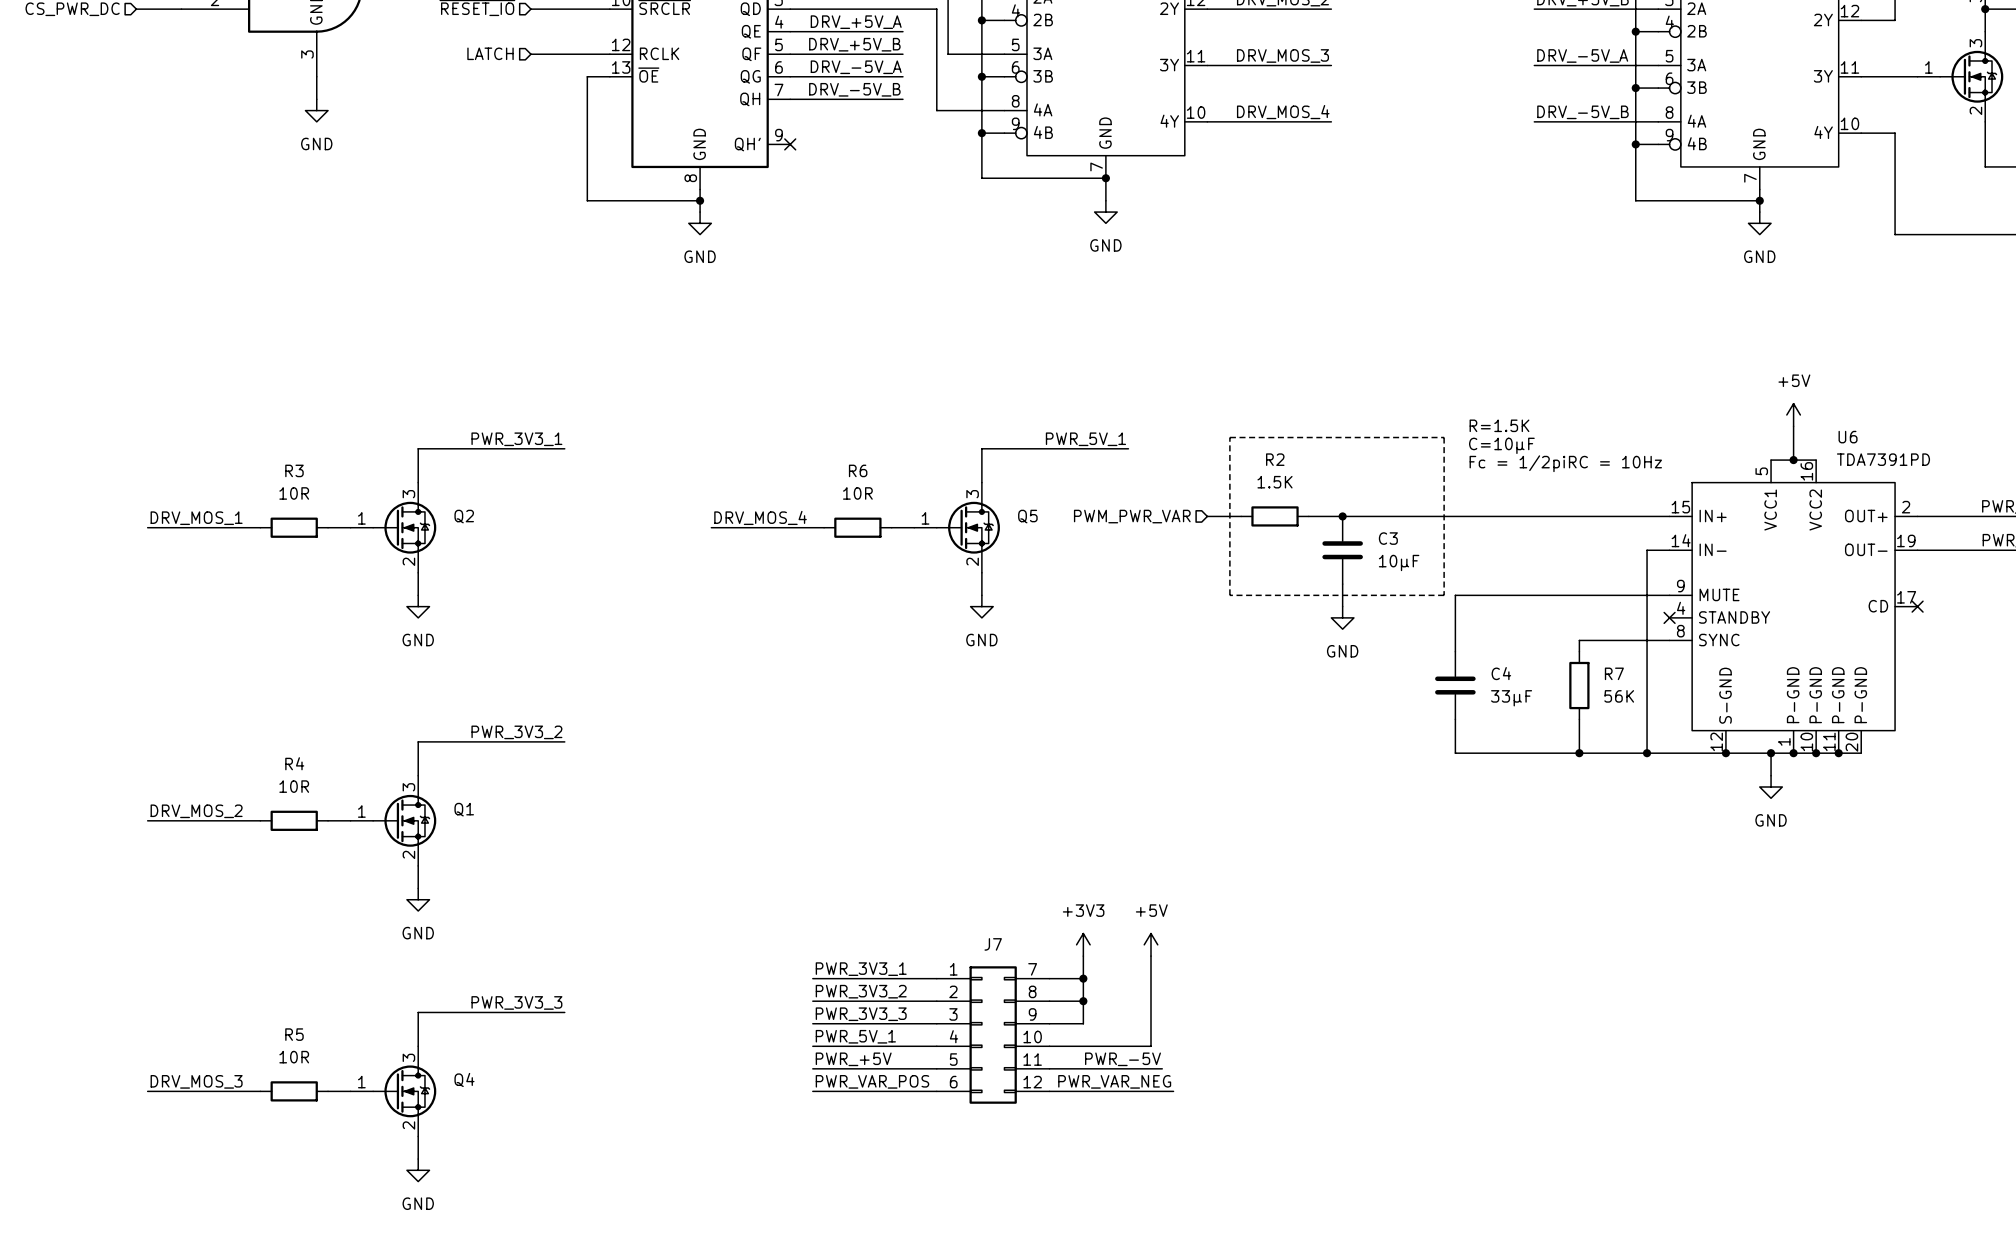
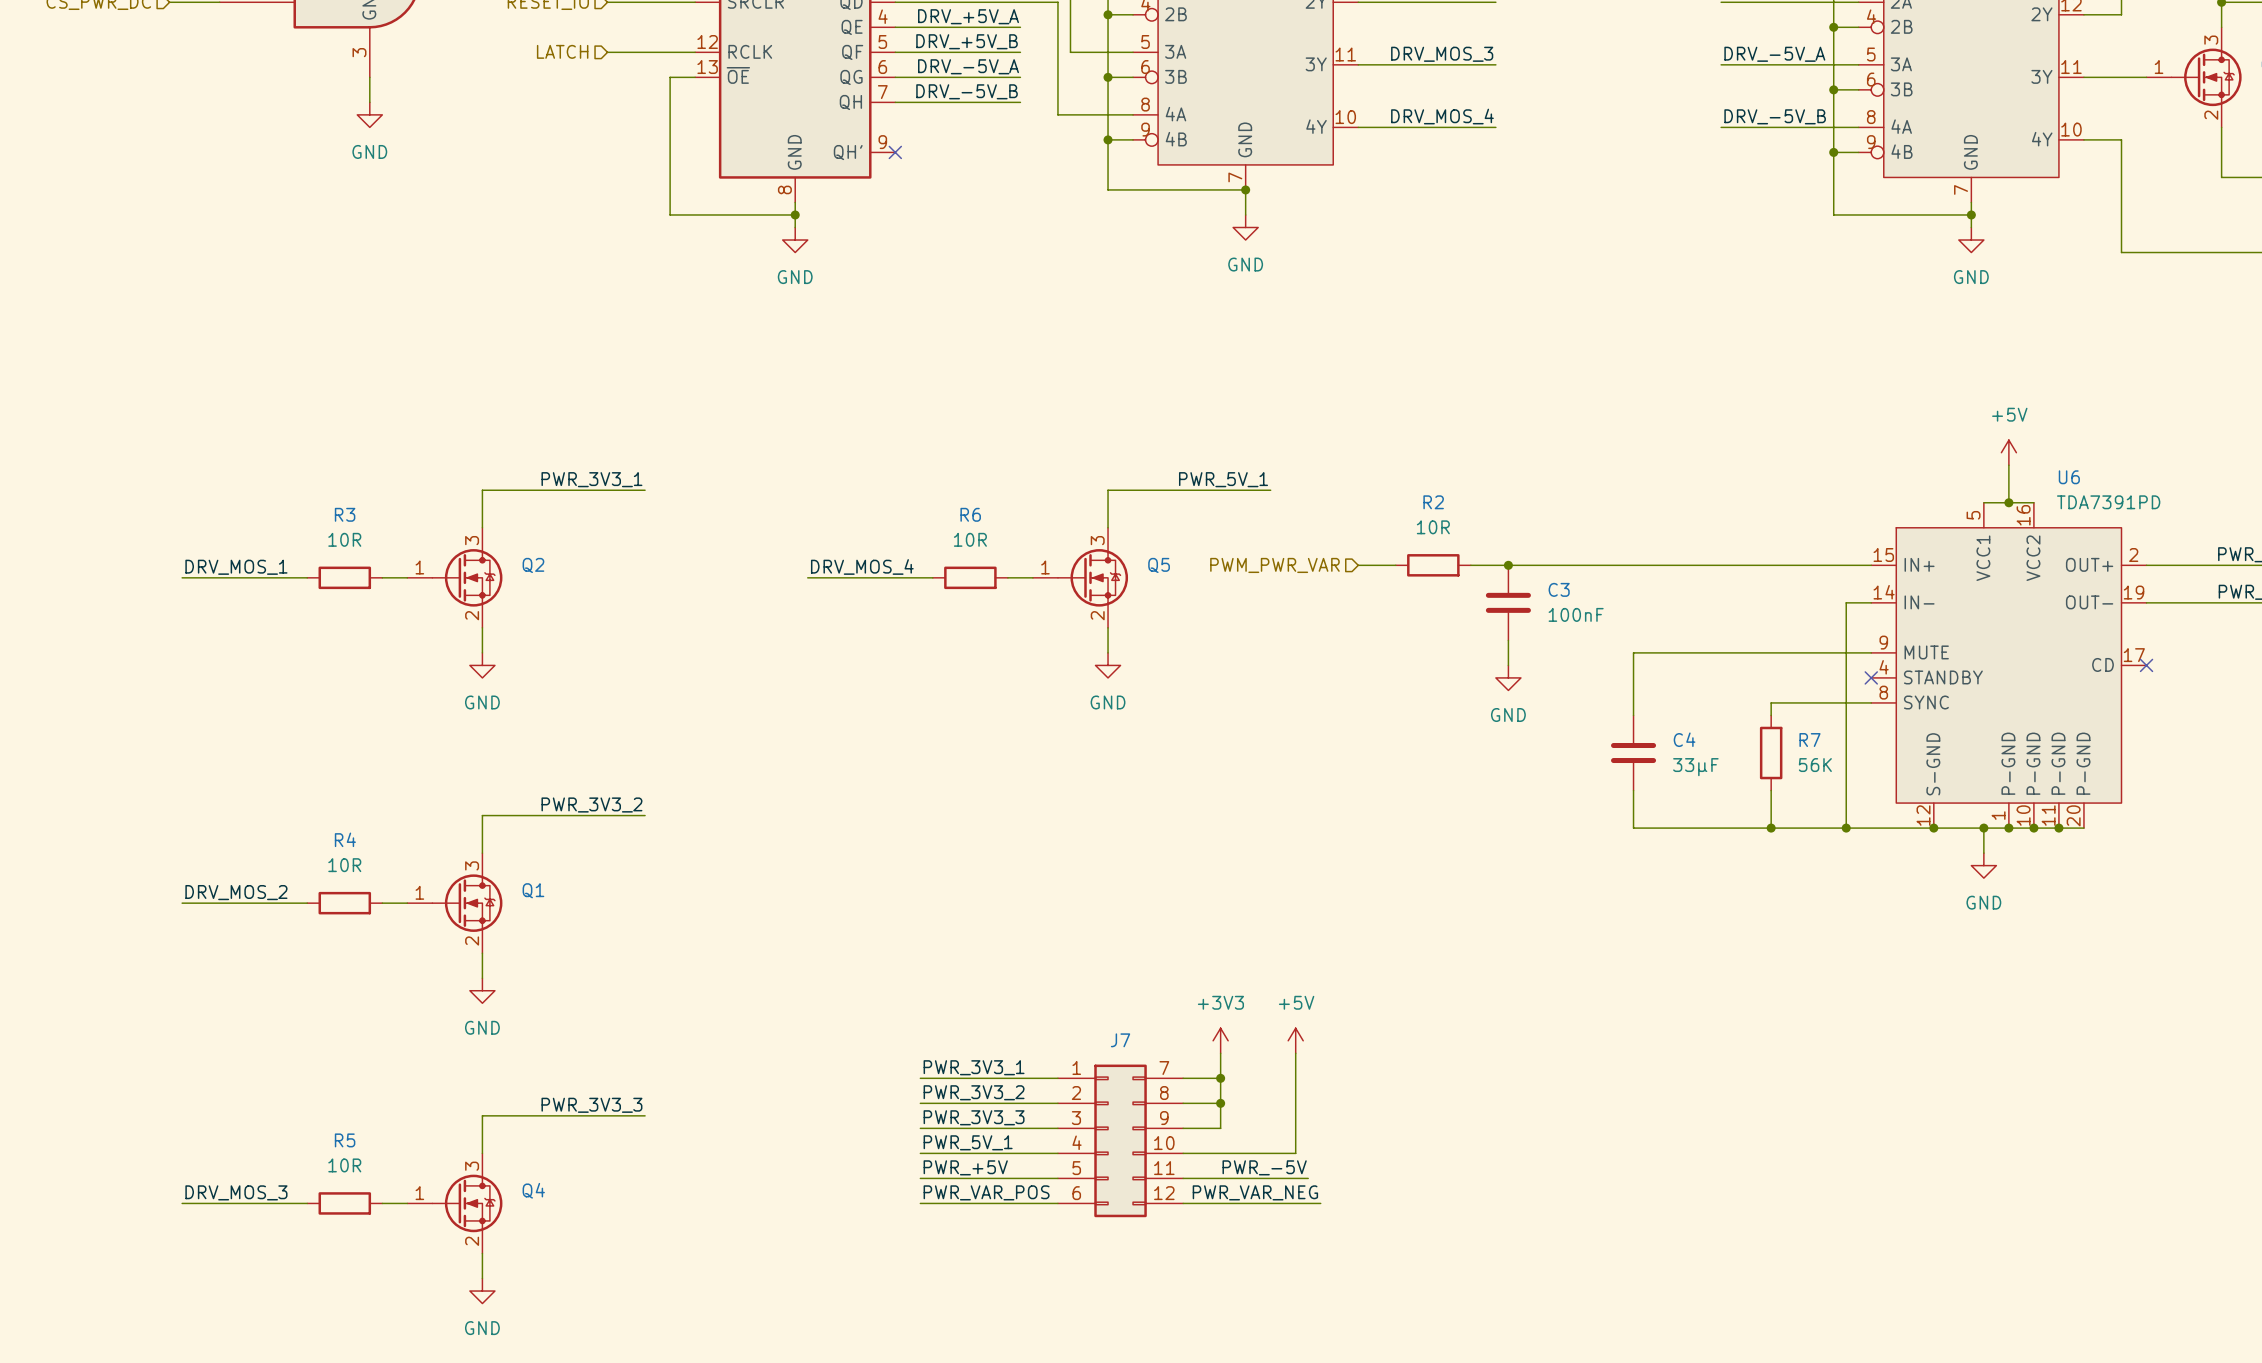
text: R=1.5K (1499, 425) -> none
line: (1229, 437) (1229, 595) (1444, 595) (1444, 437) (1229, 437) -> none
text: C=10µF (1501, 445) -> none
text: Fc = 1/2piRC = 10Hz (1565, 463) -> none
R2 value: 1.5K (1275, 482) -> 10R (1433, 527)
C3 value: 10µF (1399, 562) -> 100nF (1576, 614)

